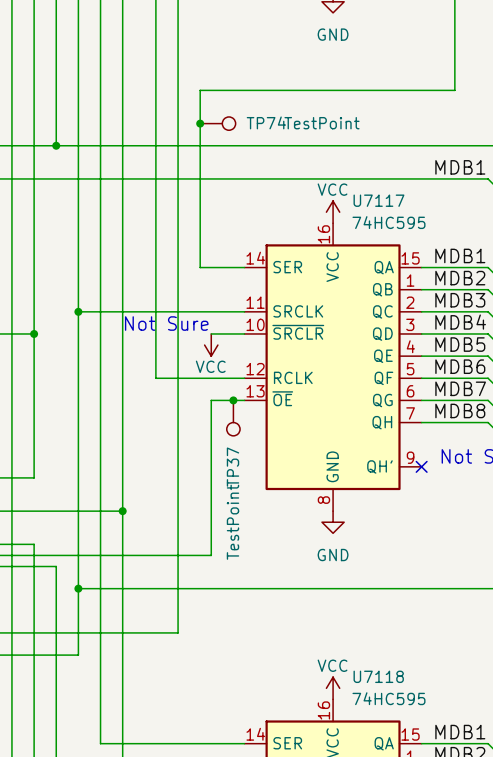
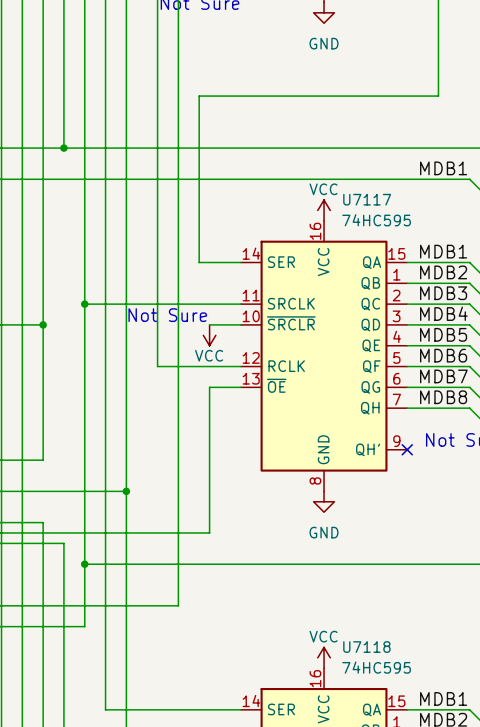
junction: (200, 123) -> none
TP74: TestPoint (217, 123) -> none
junction: (233, 400) -> none
TP37: TestPoint (233, 418) -> none

